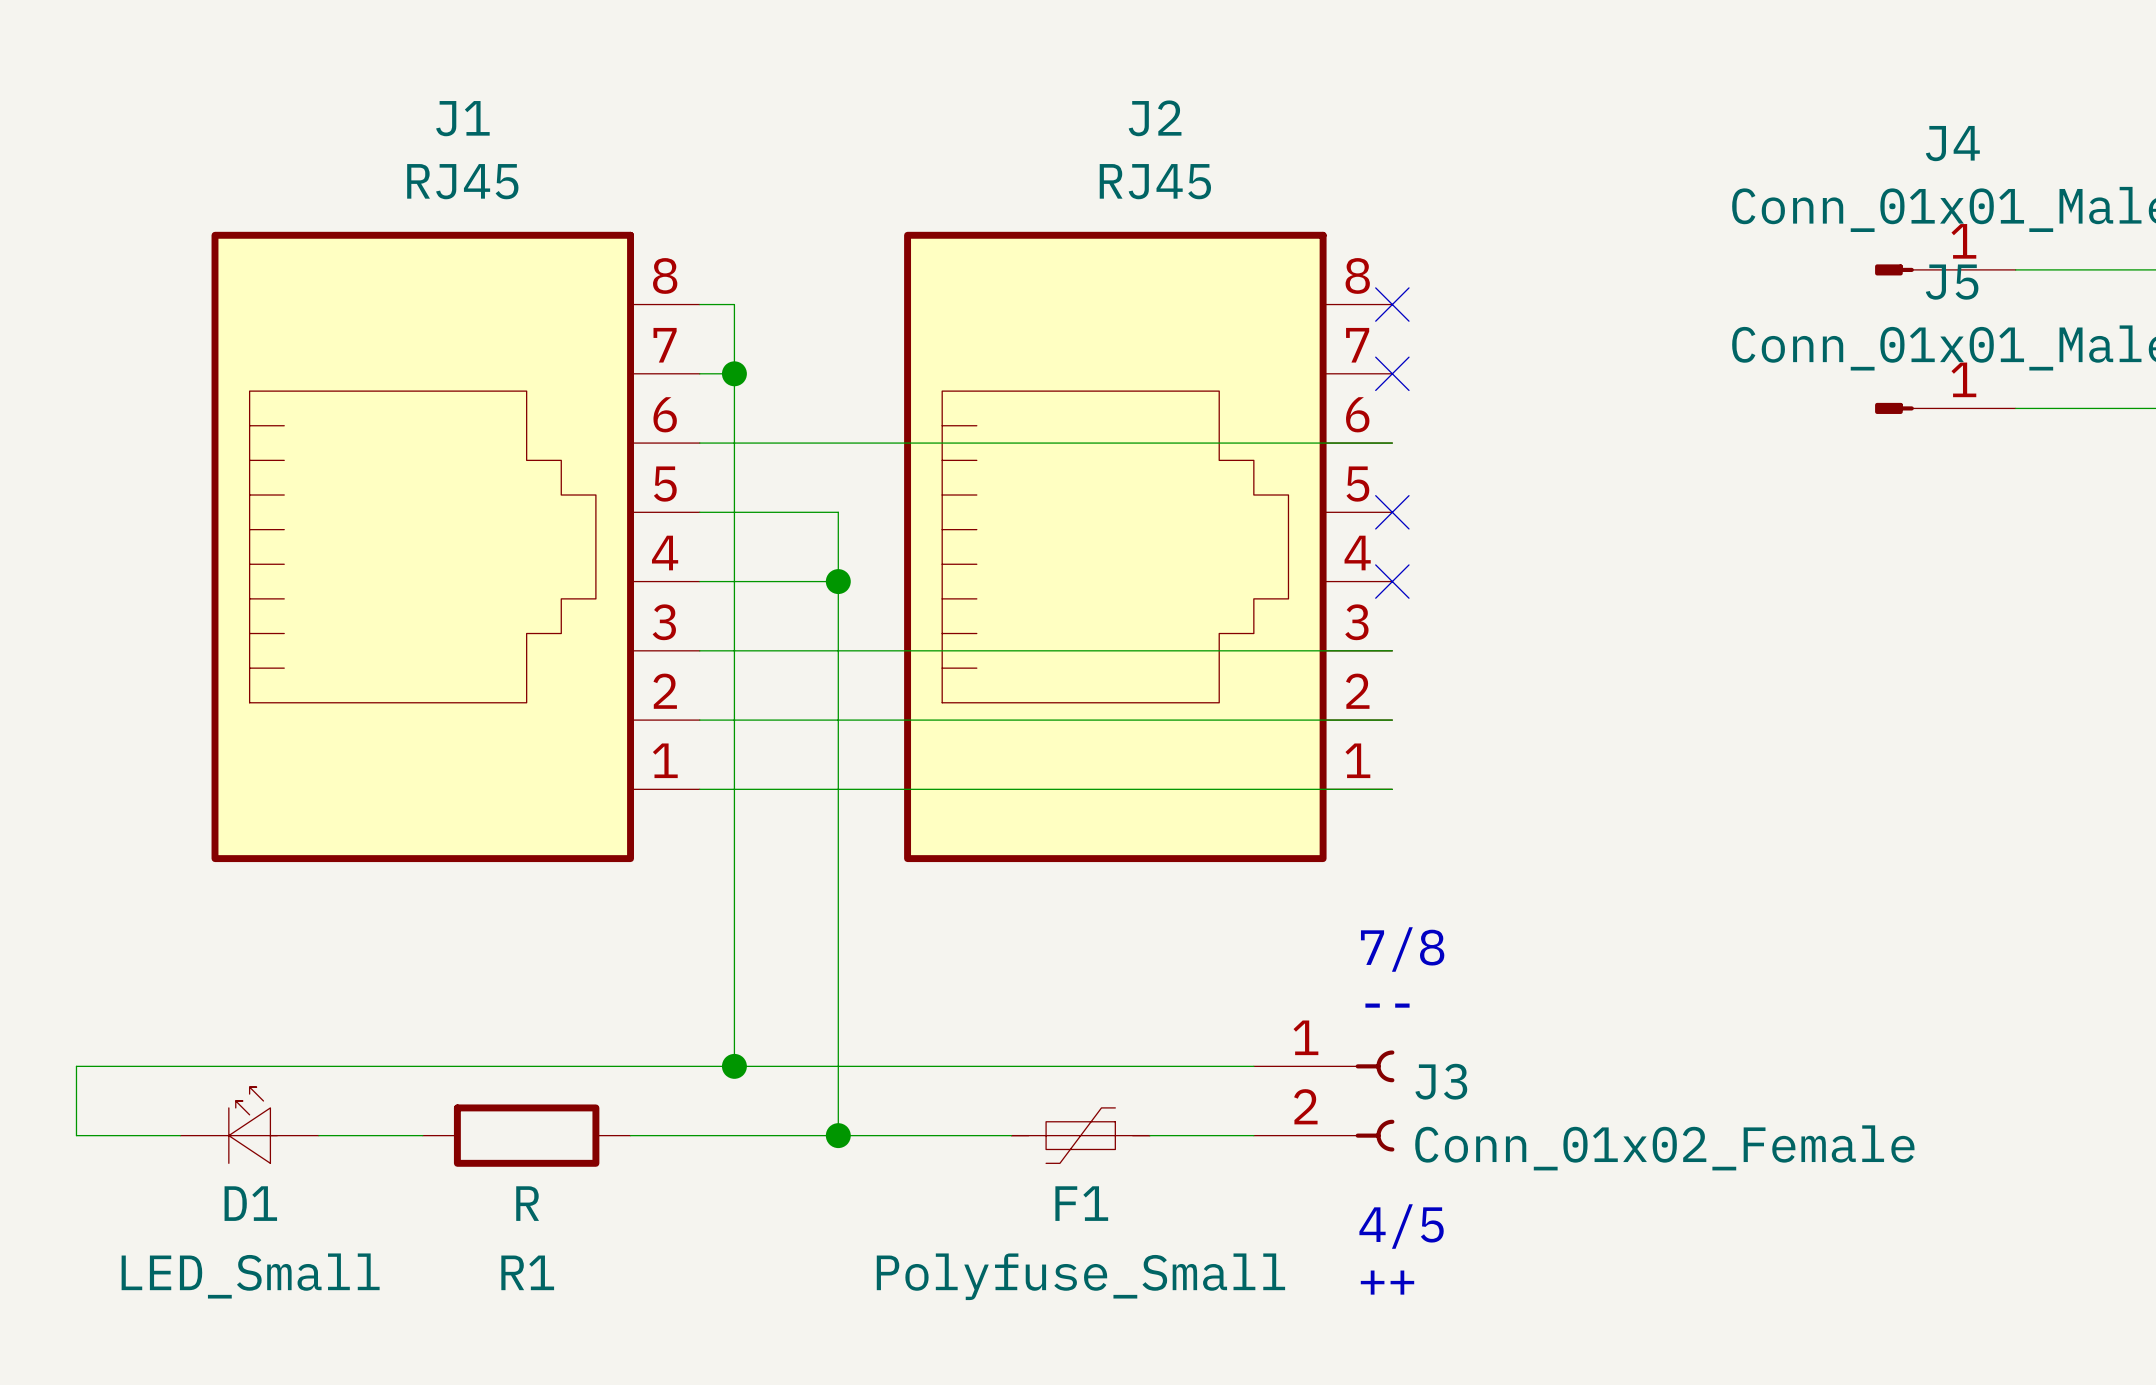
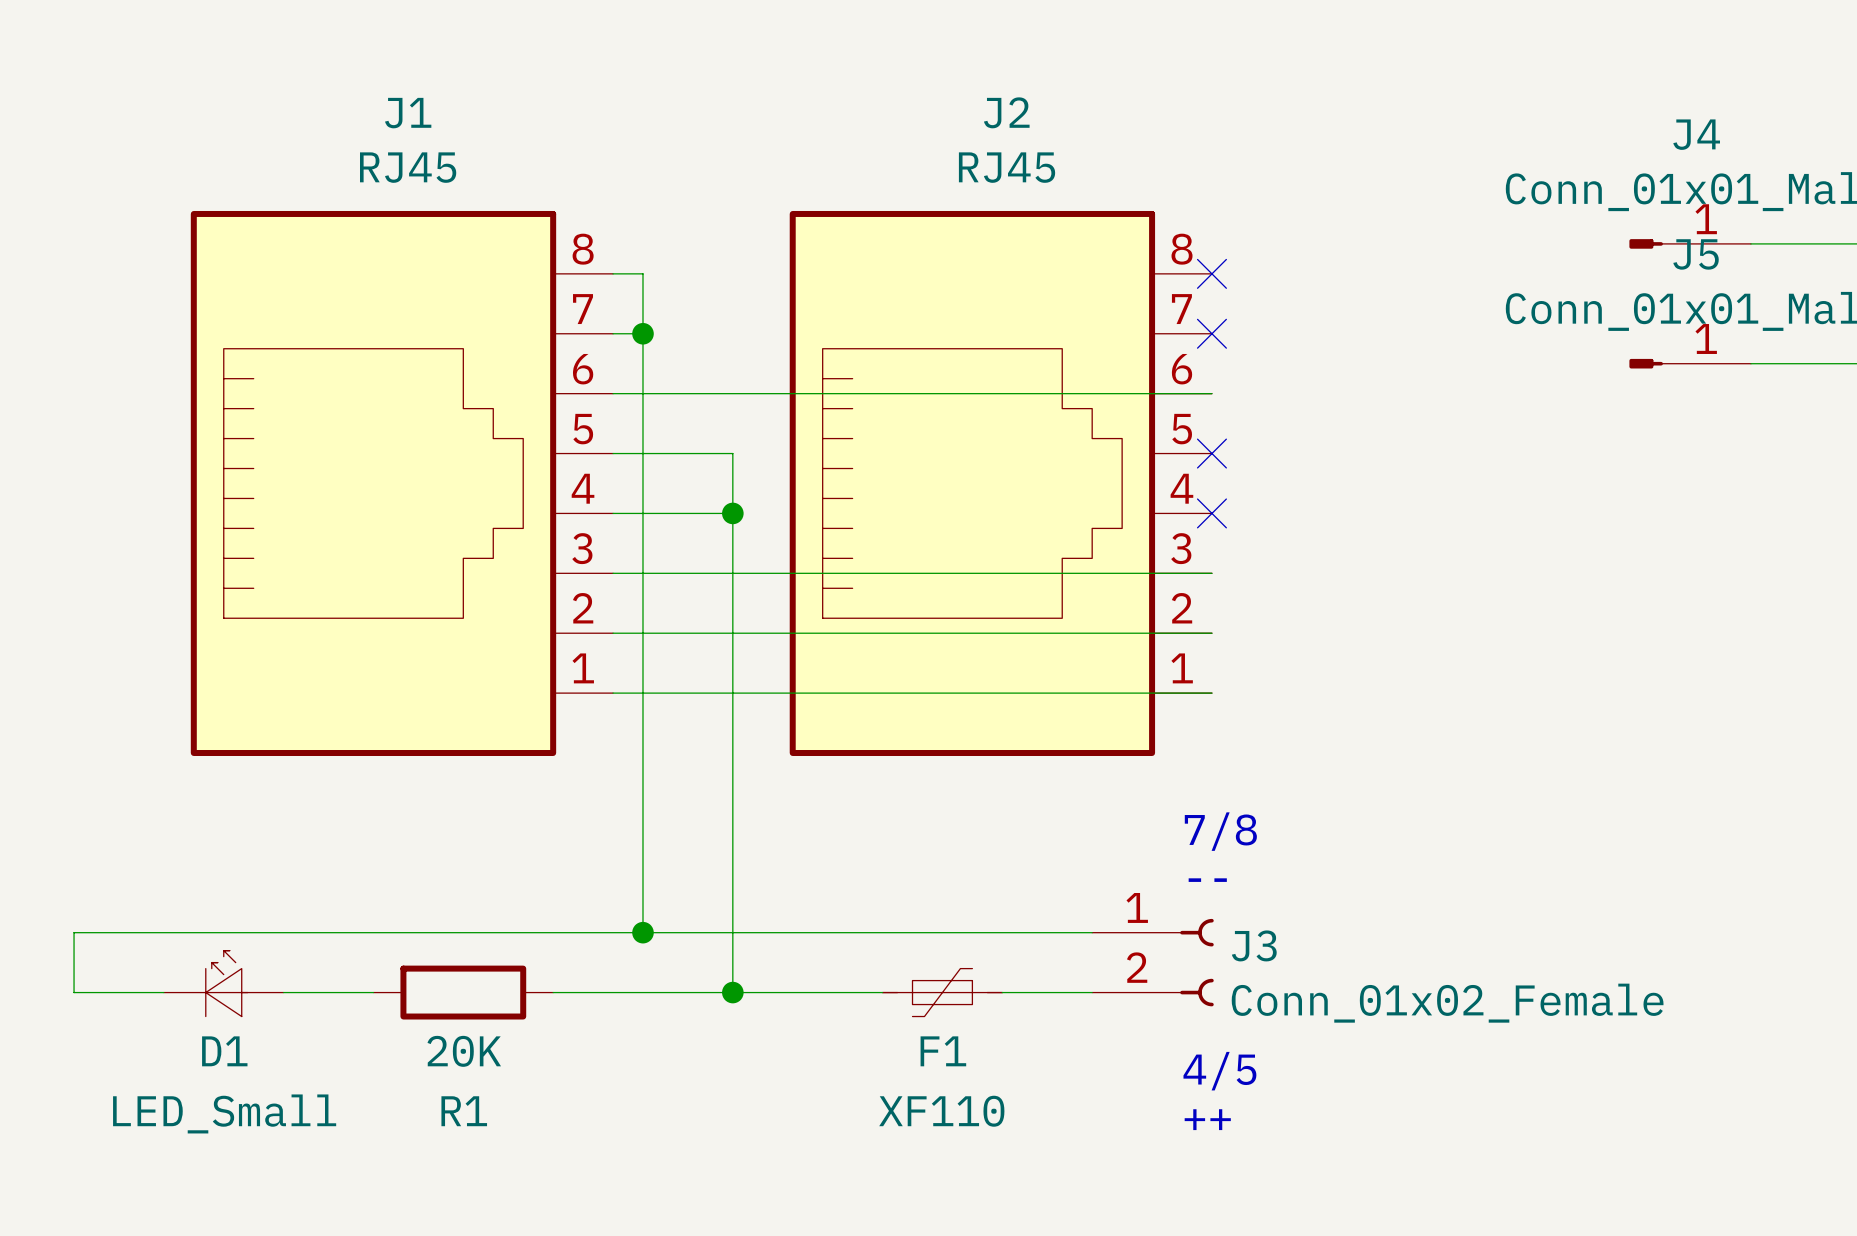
R1 value: R (527, 1203) -> 20K (464, 1051)
F1 value: Polyfuse_Small (1080, 1276) -> XF110 (941, 1111)

